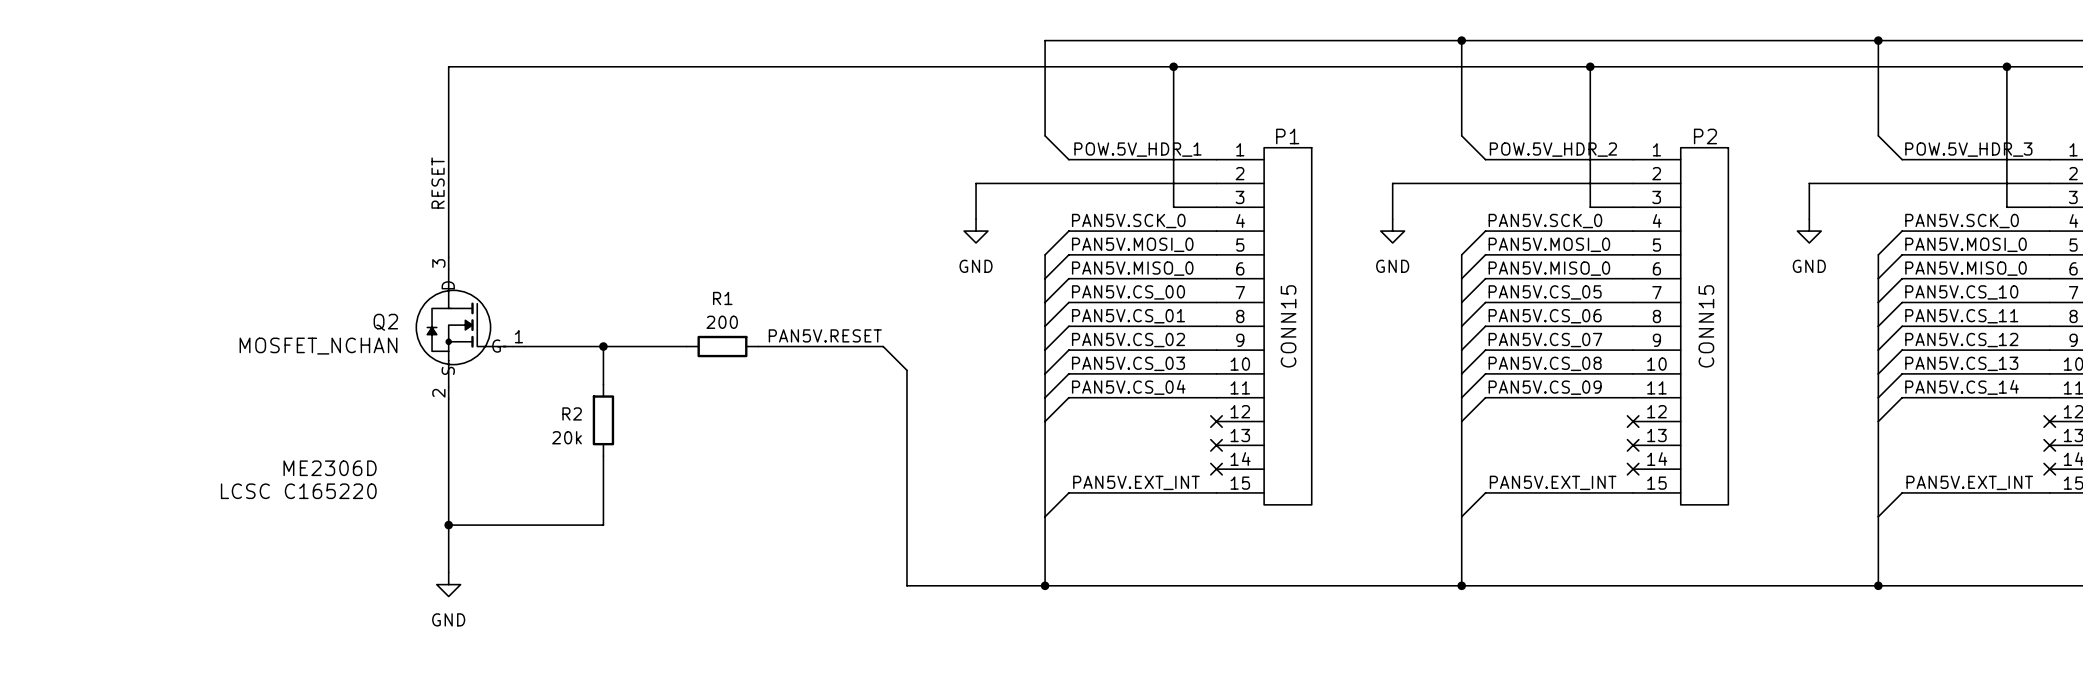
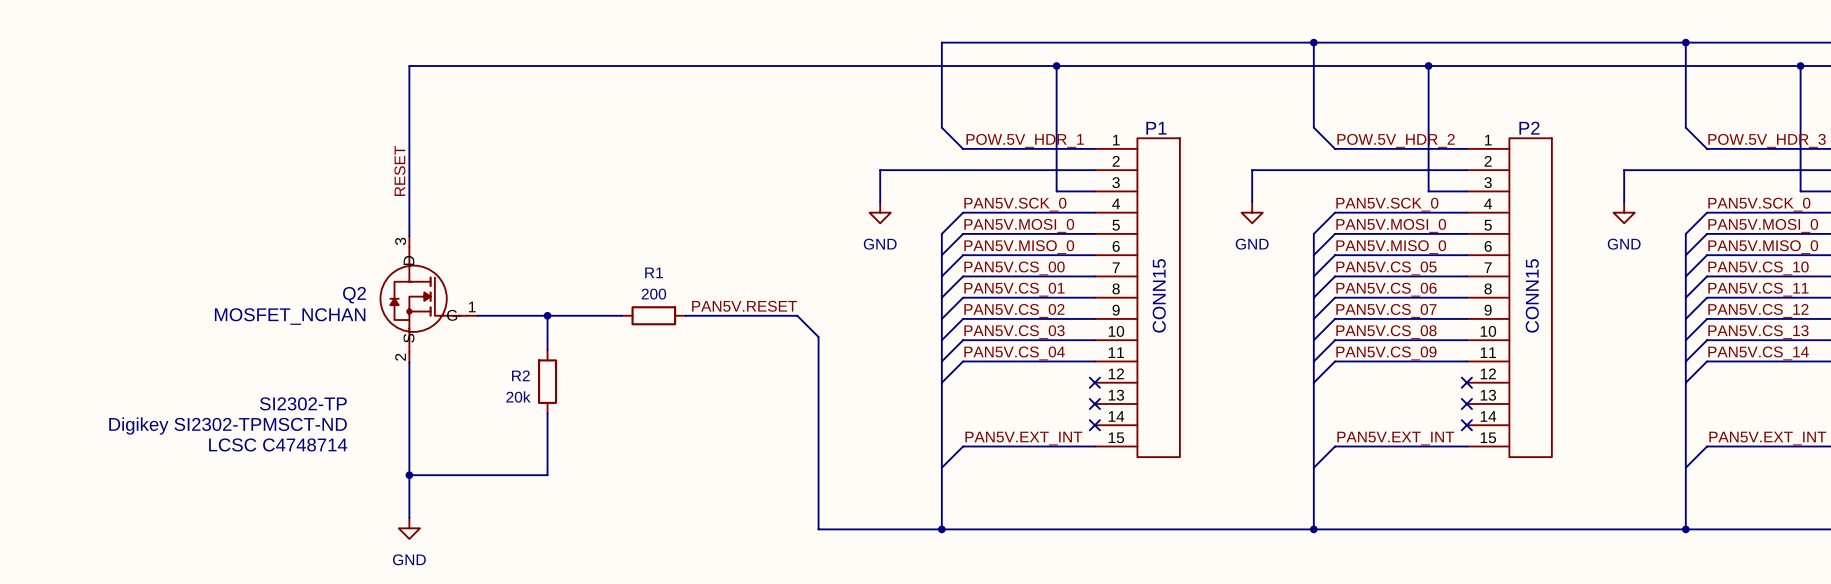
text: none -> SI2302-TP (303, 403)
text: ME2306D (330, 468) -> Digikey SI2302-TPMSCT-ND (228, 426)
text: LCSC C165220 (298, 491) -> LCSC C4748714 (278, 444)

